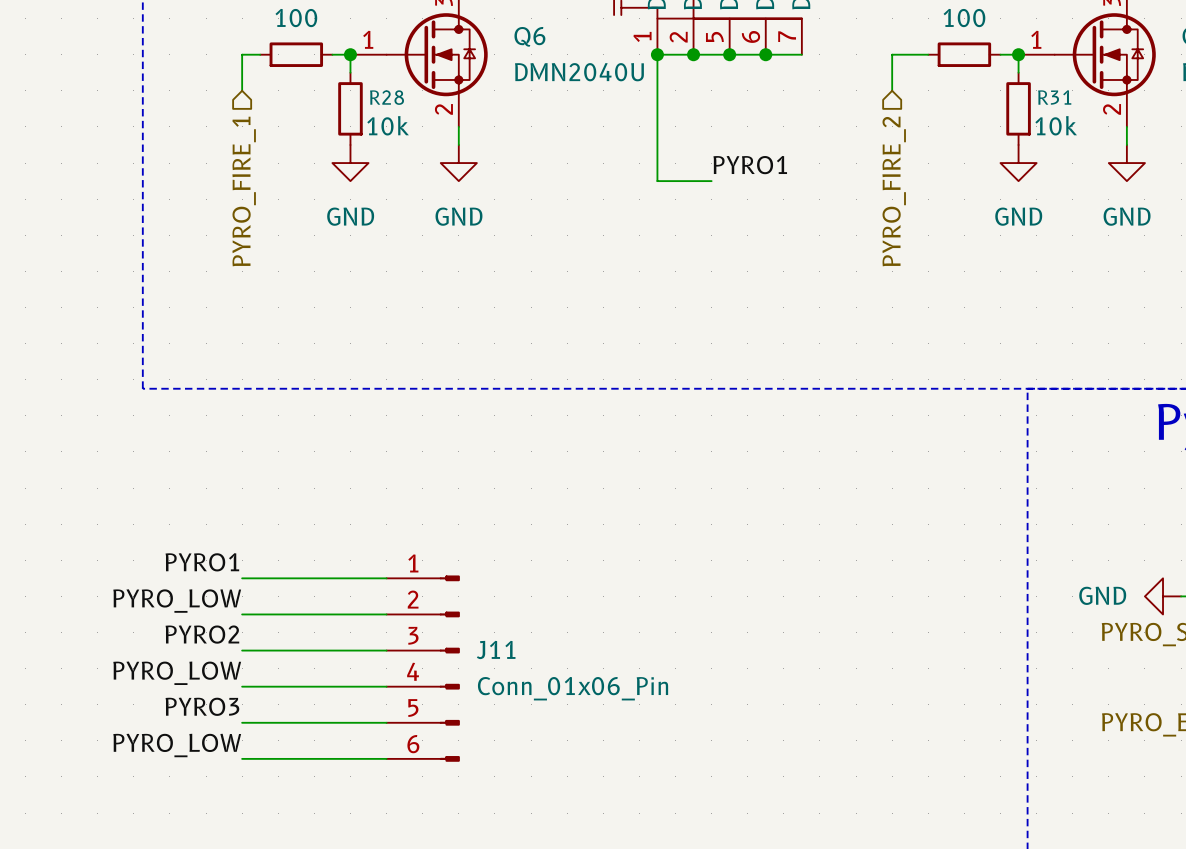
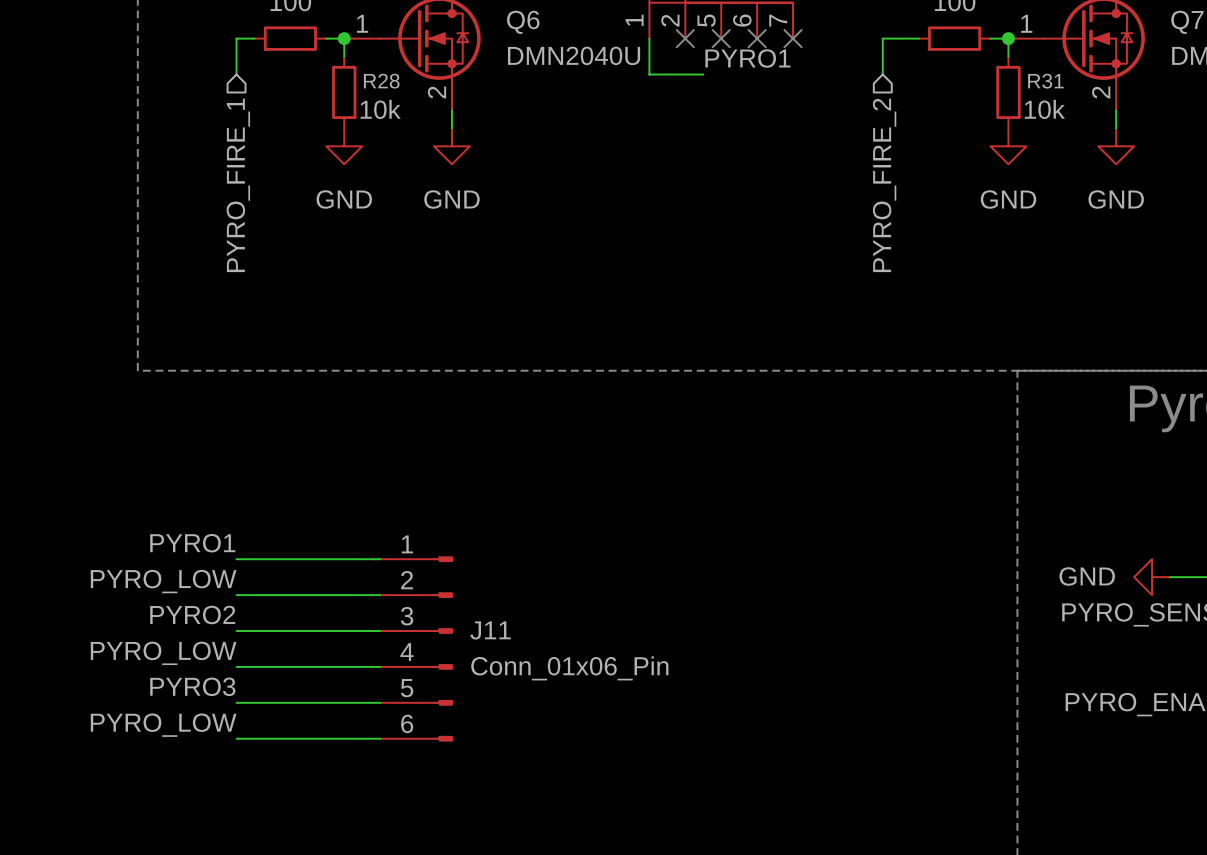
wire: (657, 54) (801, 54) -> none
junction: (657, 54) -> none
junction: (693, 54) -> none
no-connect mark: none -> (685, 38)
junction: (729, 54) -> none
no-connect mark: none -> (721, 38)
junction: (765, 54) -> none
no-connect mark: none -> (757, 38)
no-connect mark: none -> (793, 38)
wire: (657, 90) (657, 181) (711, 181) -> (649, 74) (703, 74)
label position: PYRO1 (750, 165) -> PYRO1 (747, 58)

